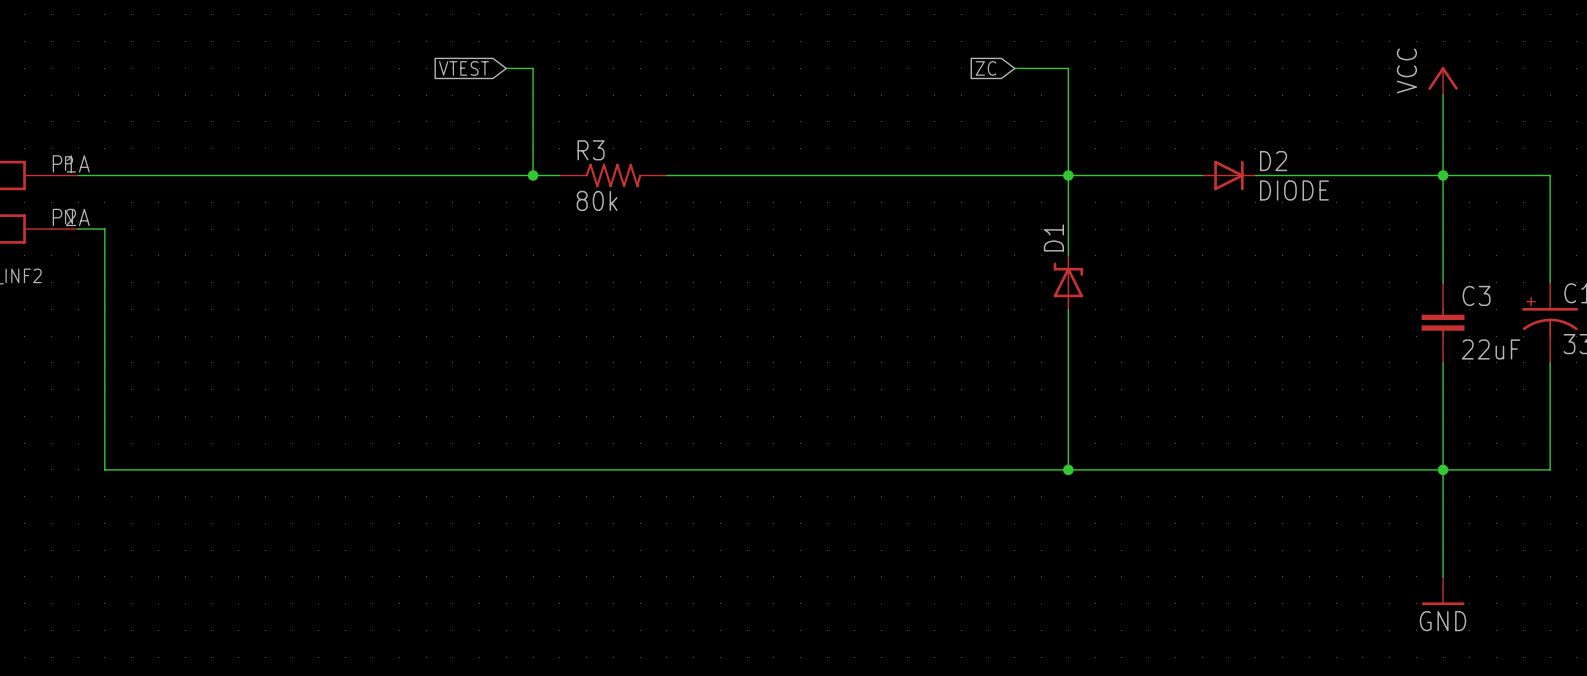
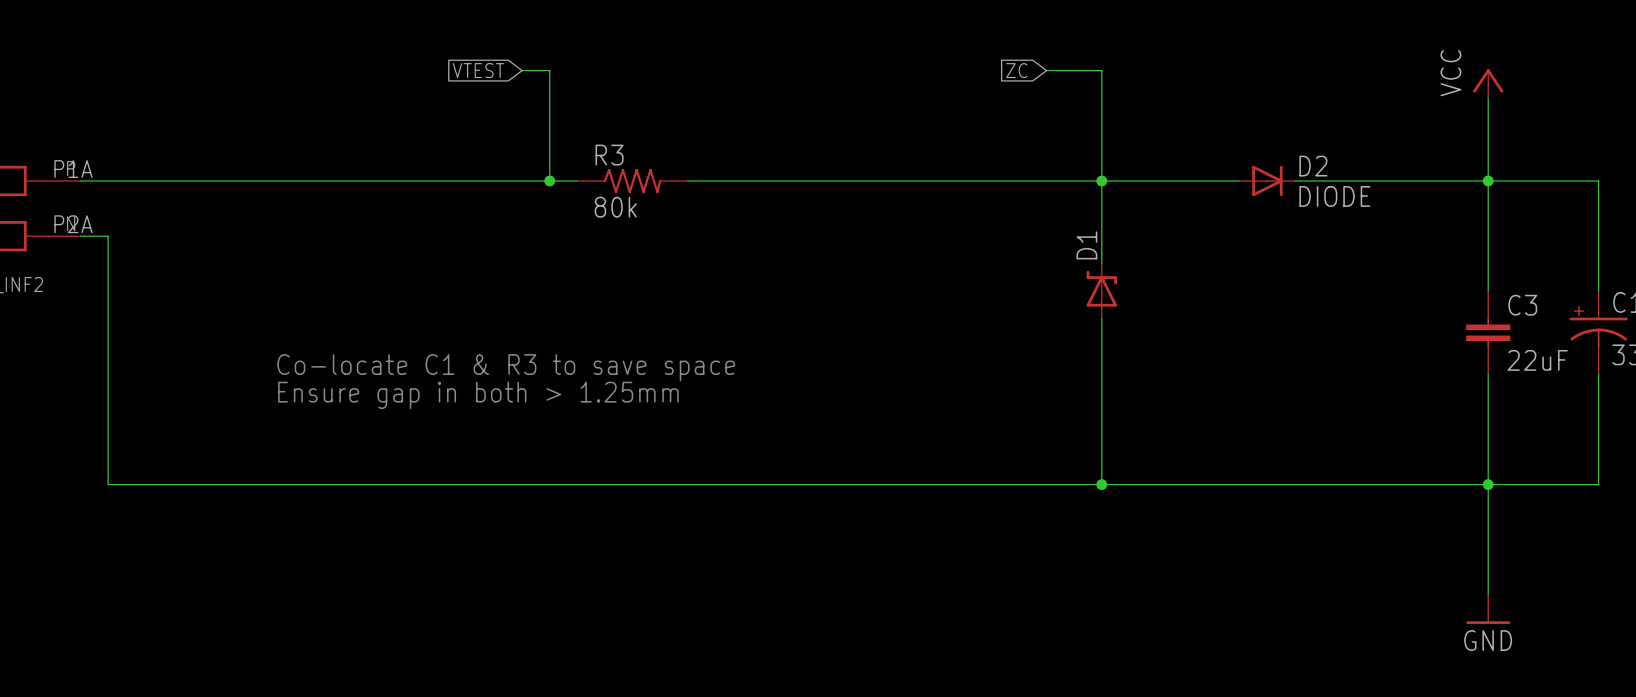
text: none -> Co-locate C1 & R3 to save space (506, 367)
text: none -> Ensure gap in both > 1.25mm (478, 395)

